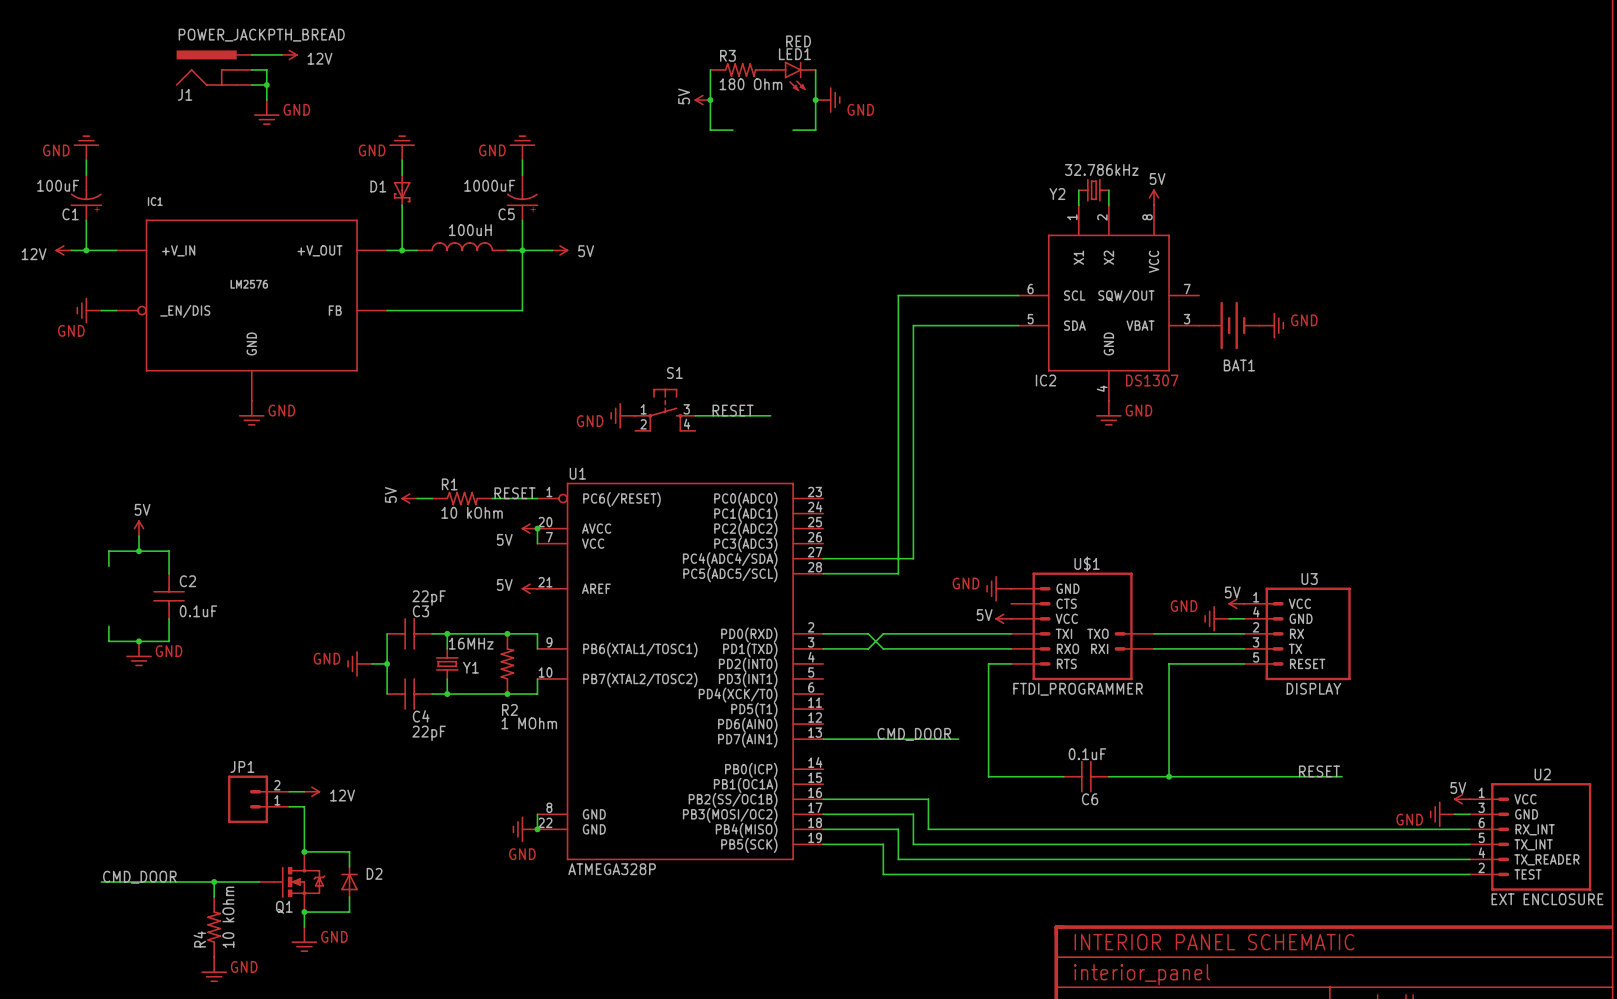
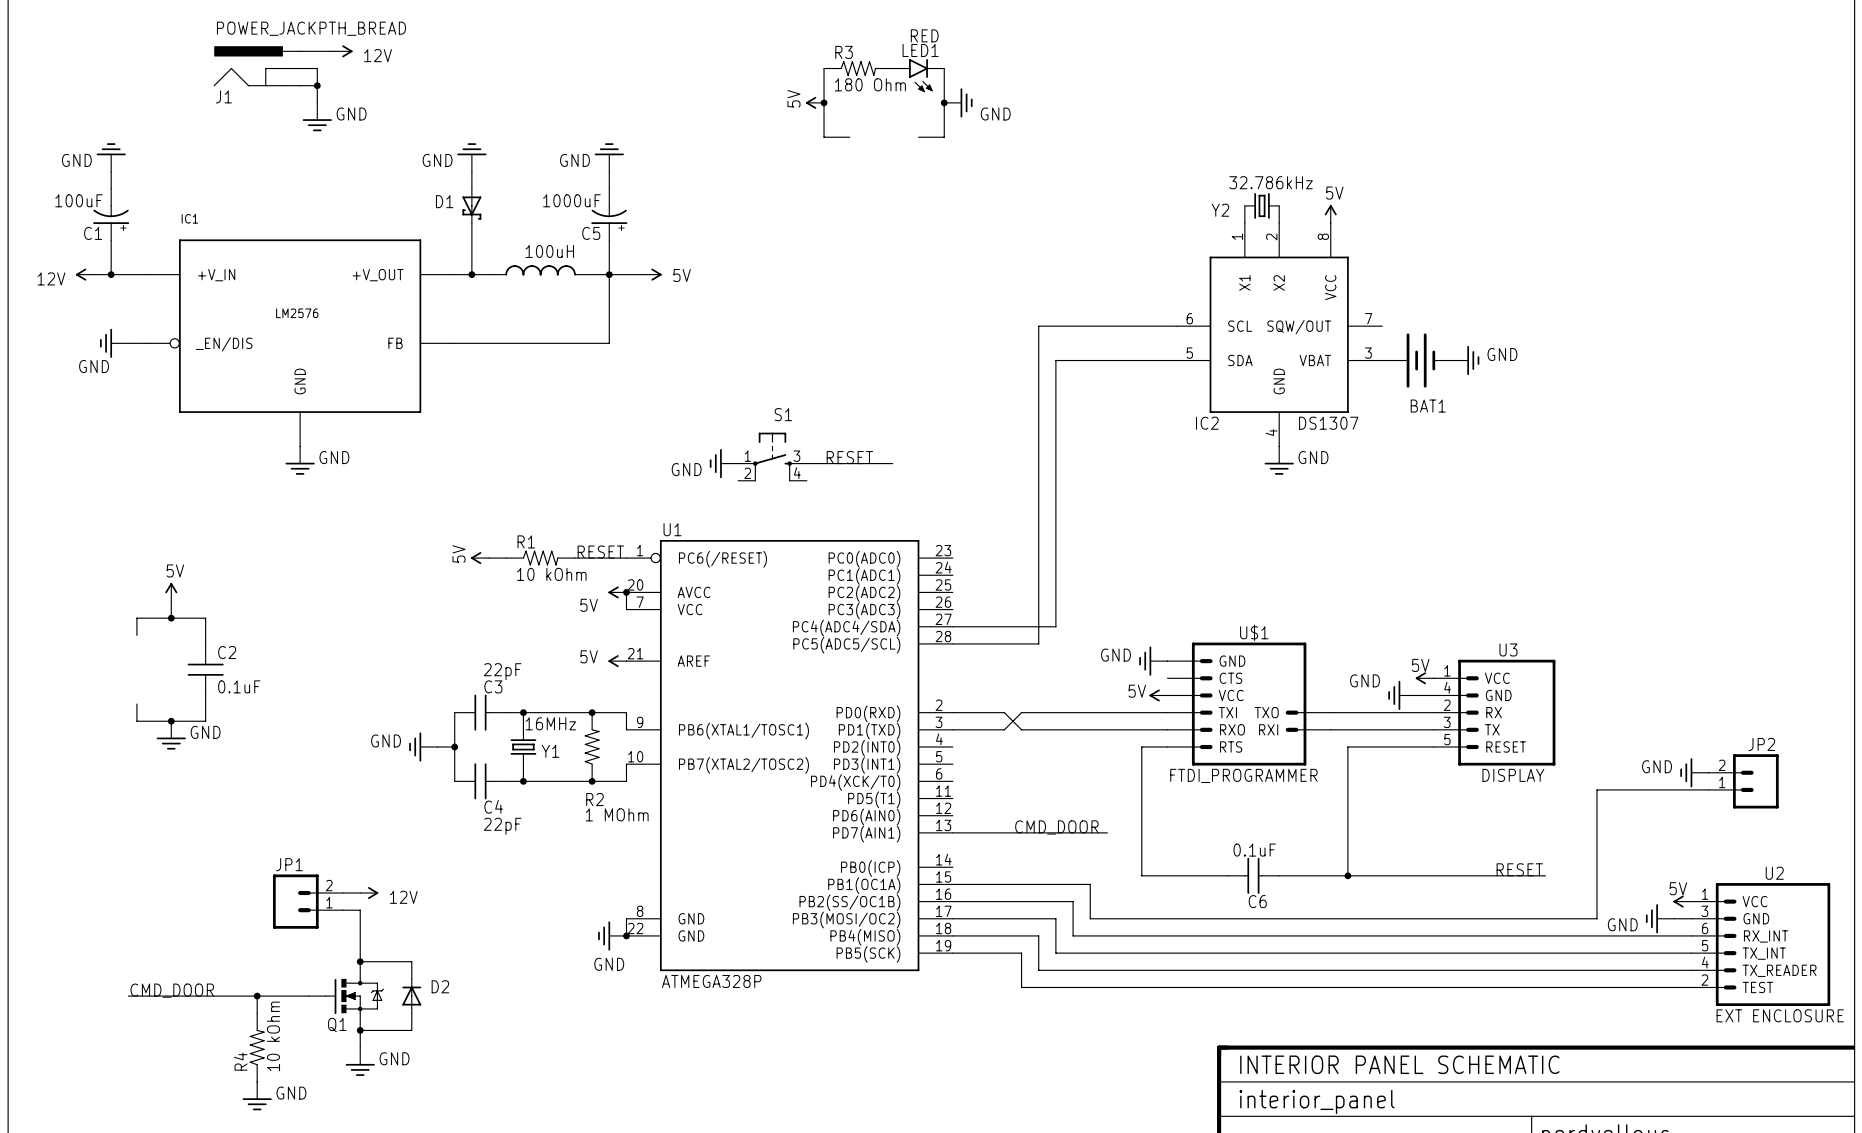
power symbol: none -> GND (1694, 772)
JP2: none -> (1743, 781)
wire: none -> (1708, 789) (1596, 789) (1596, 918) (1090, 918) (1090, 884) (952, 884)

